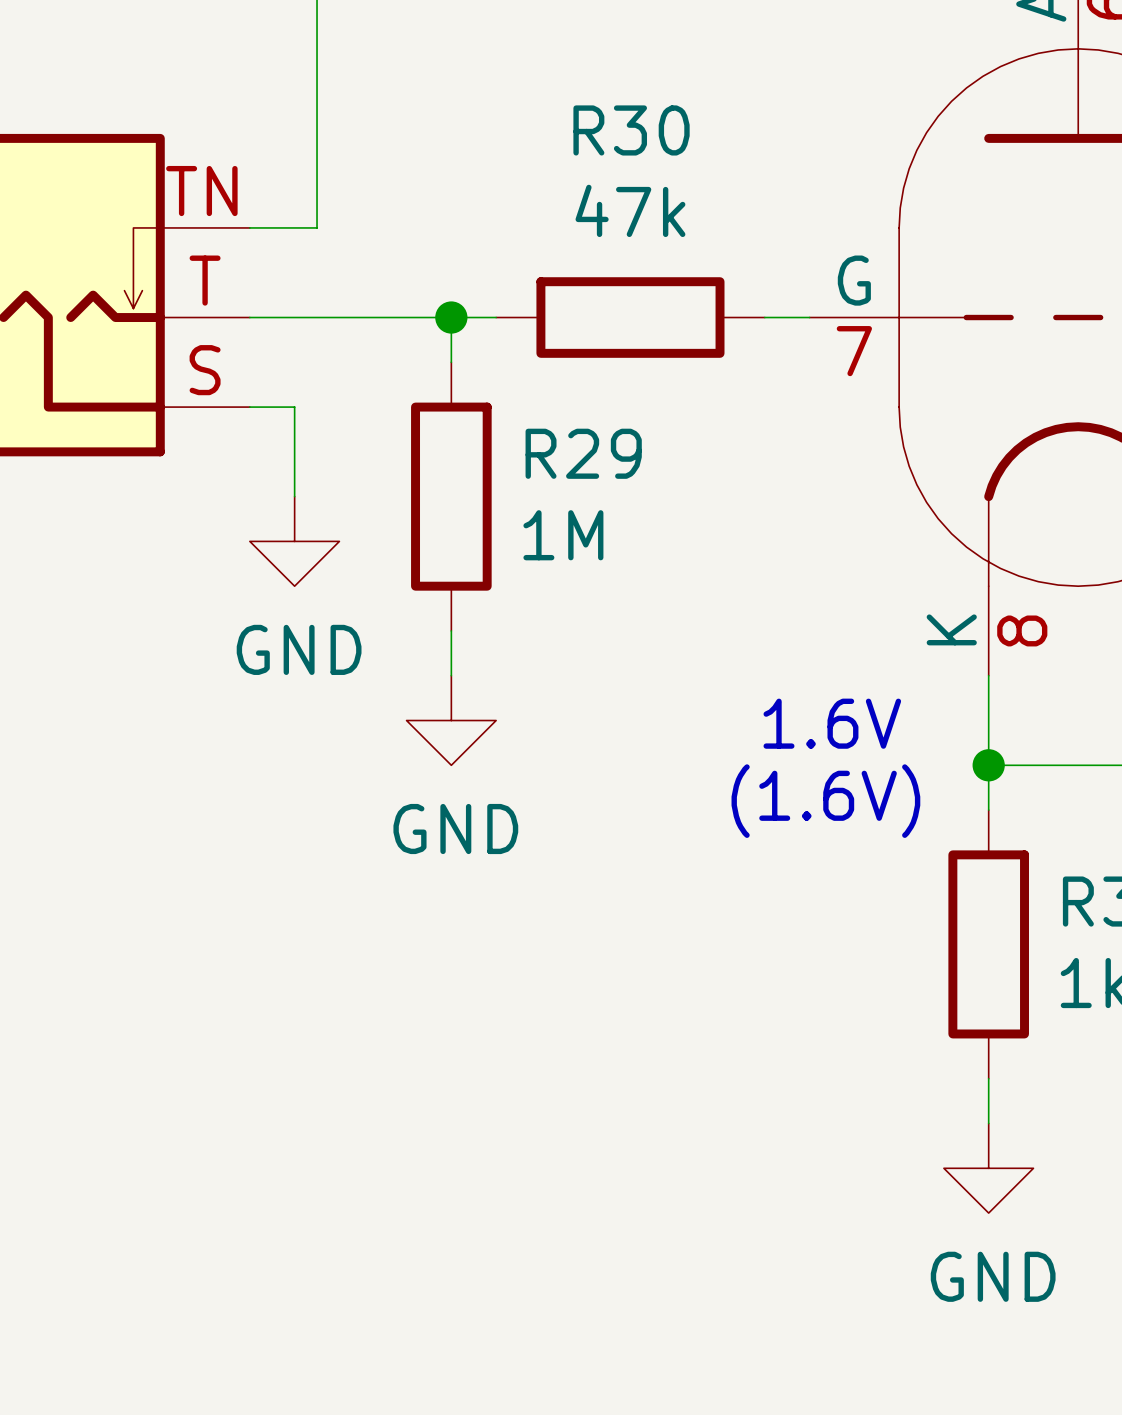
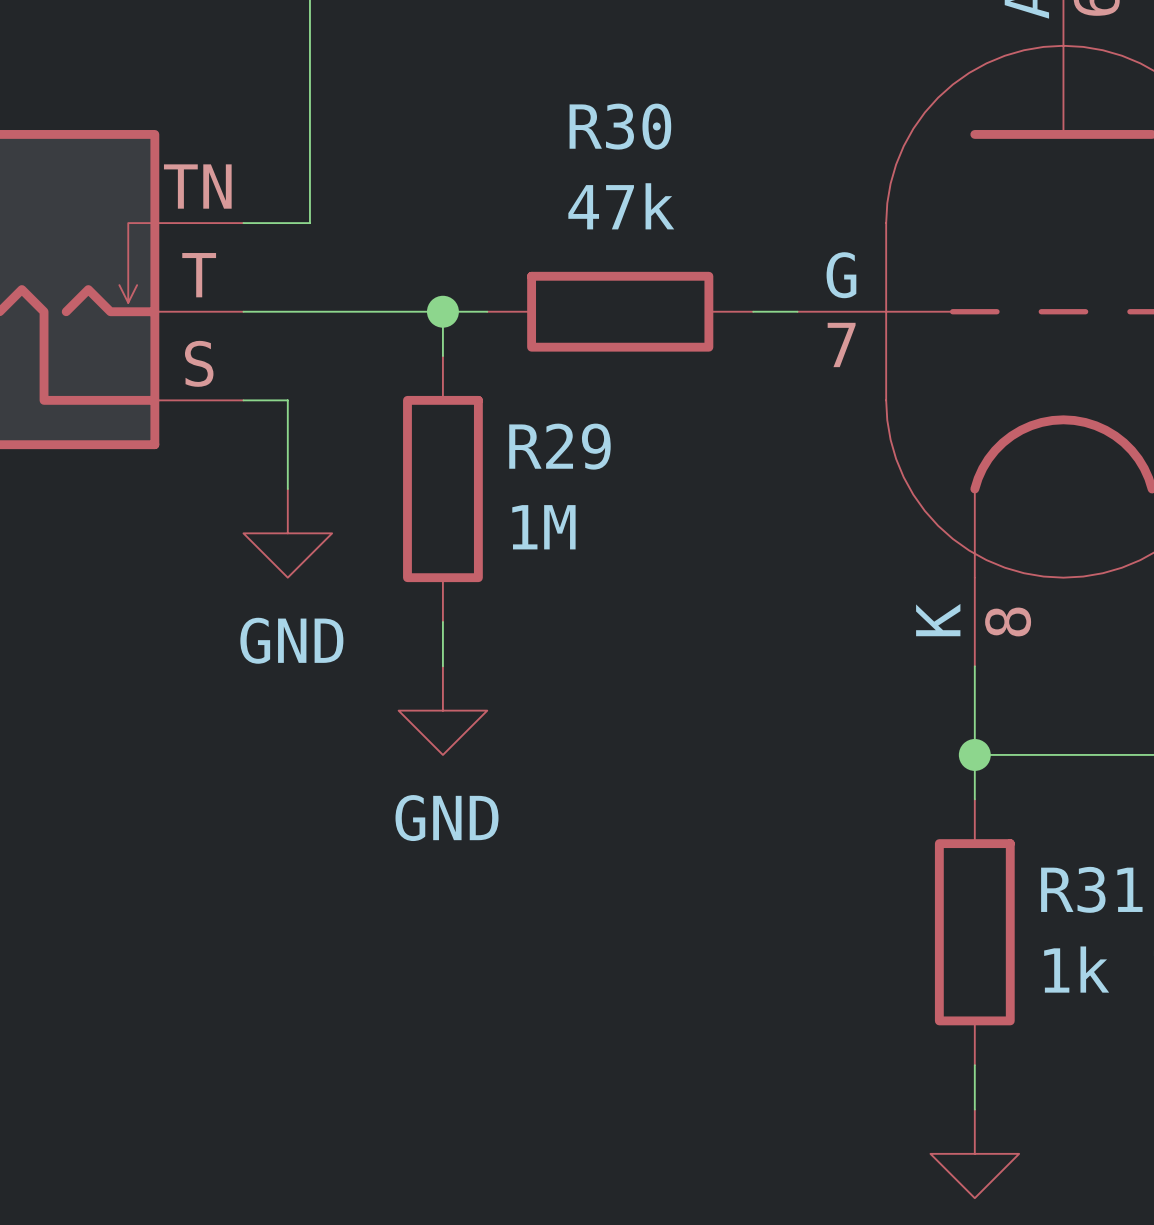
text: 1.6V (832, 723) -> none
text: (1.6V) (825, 801) -> none

